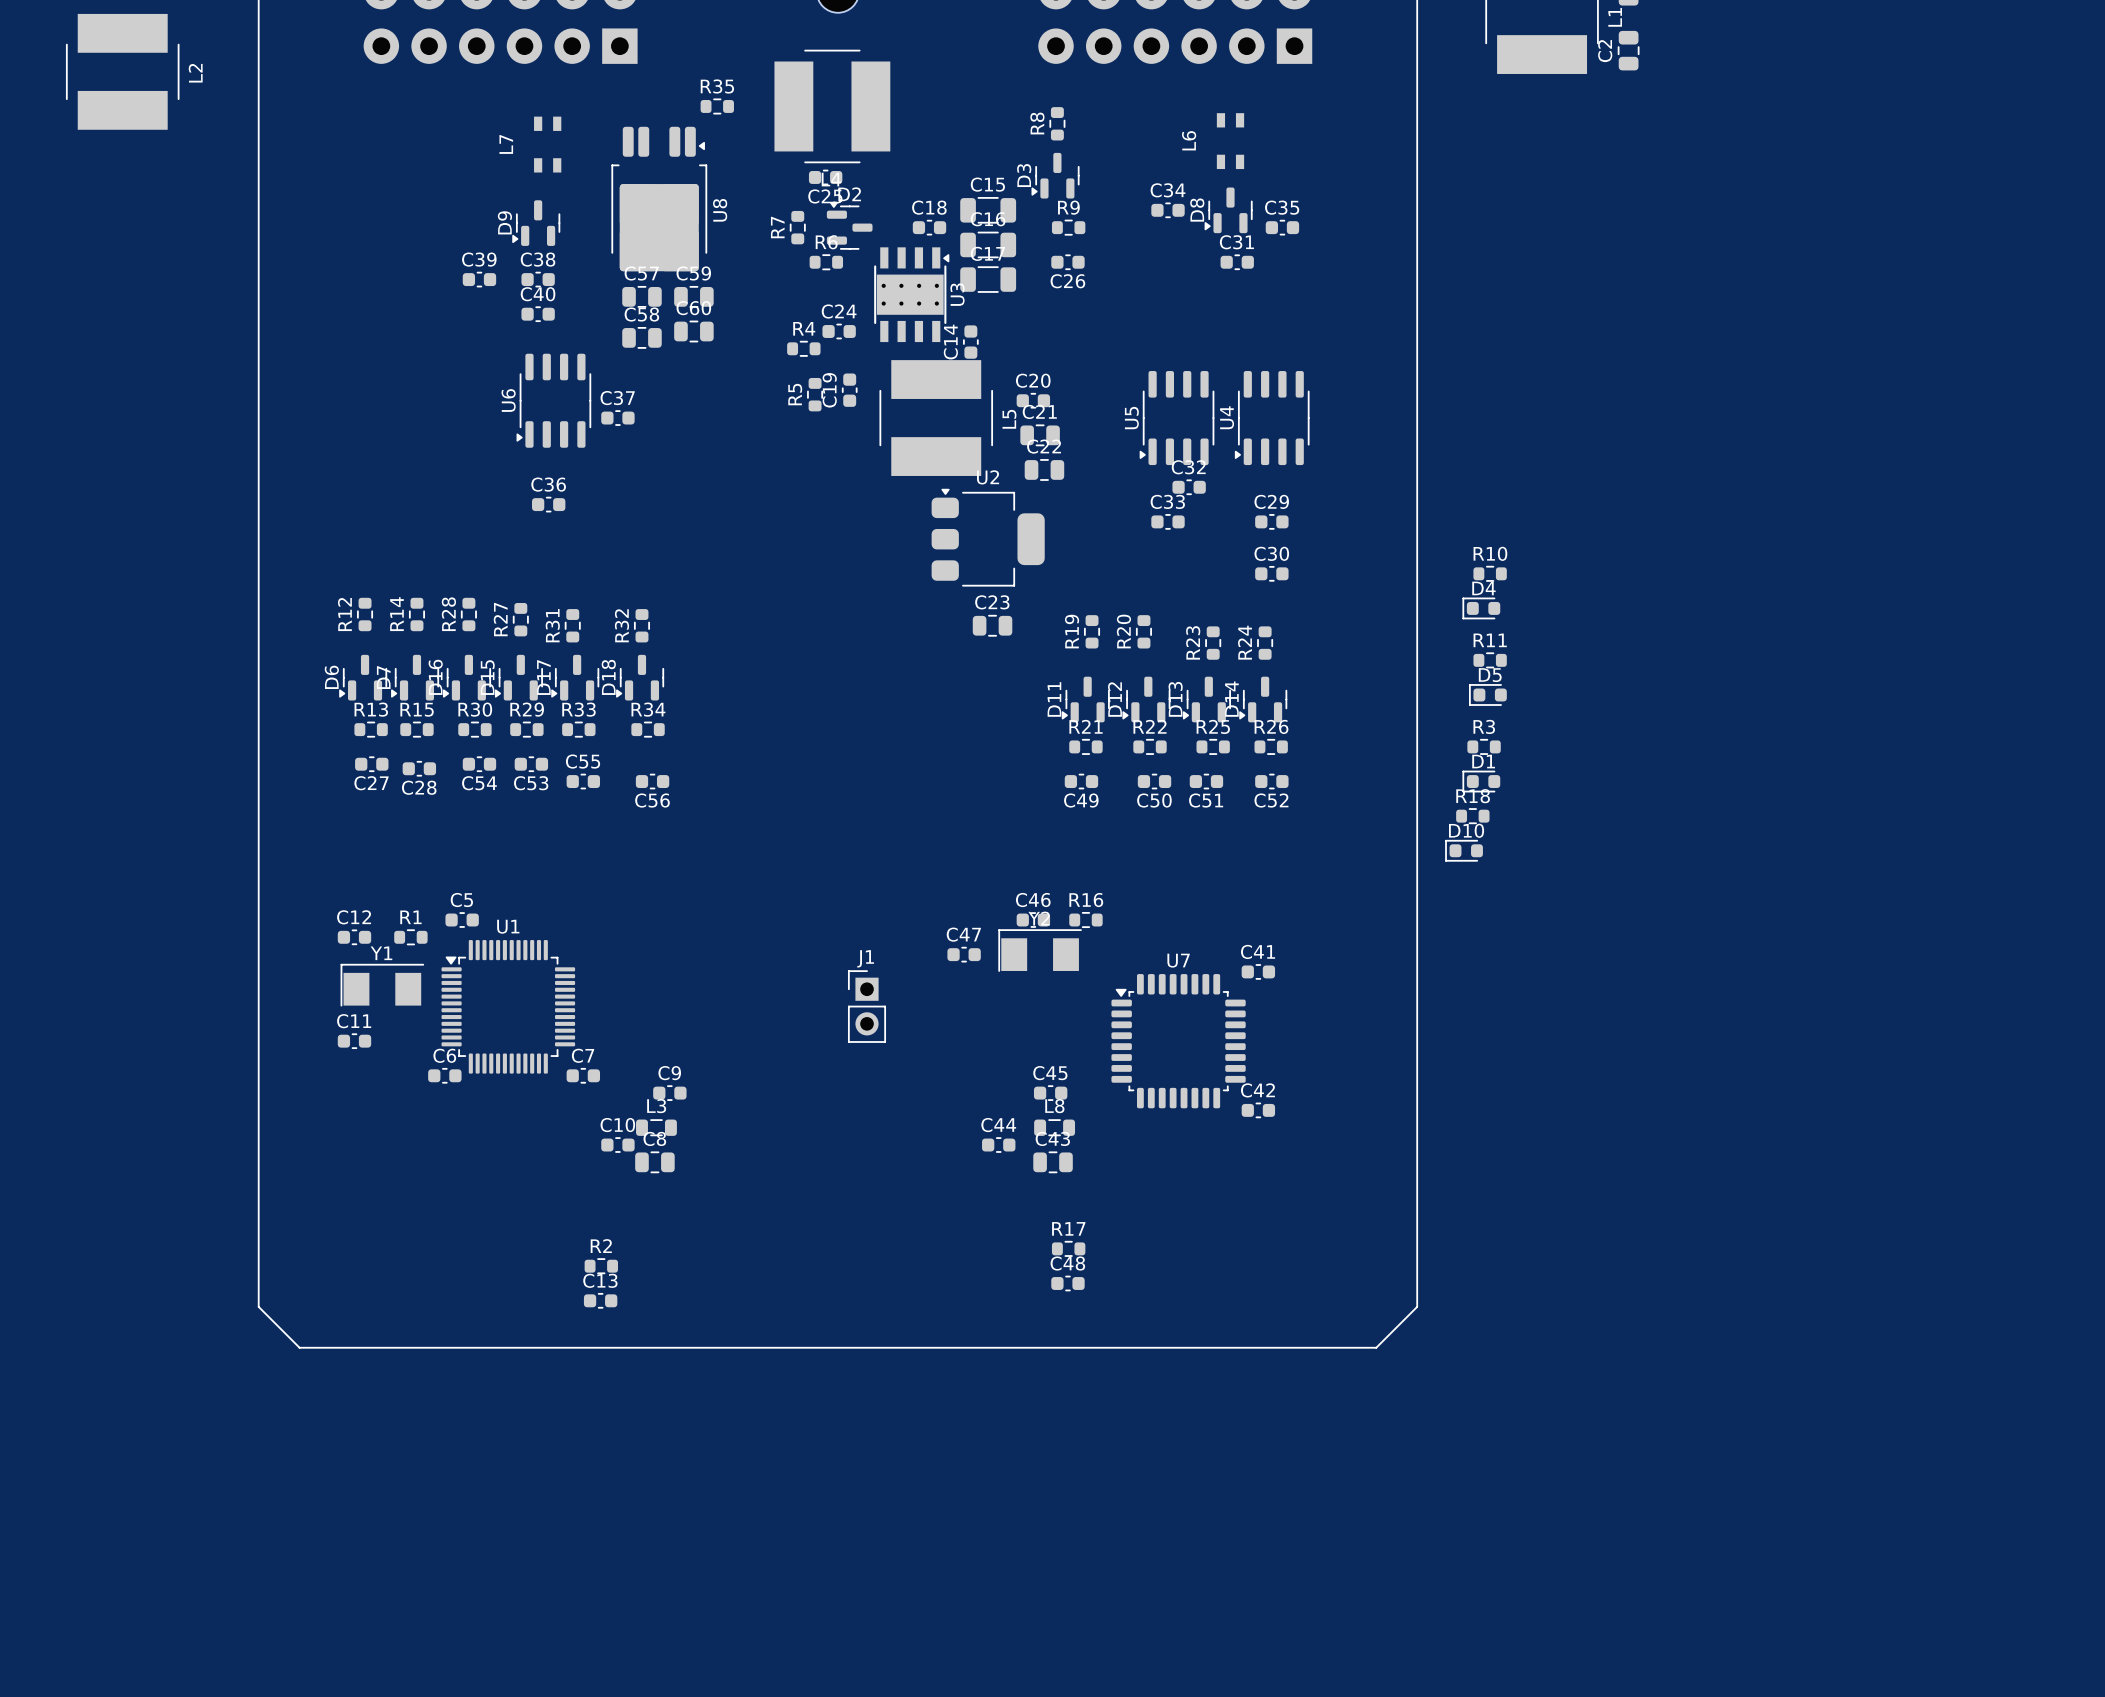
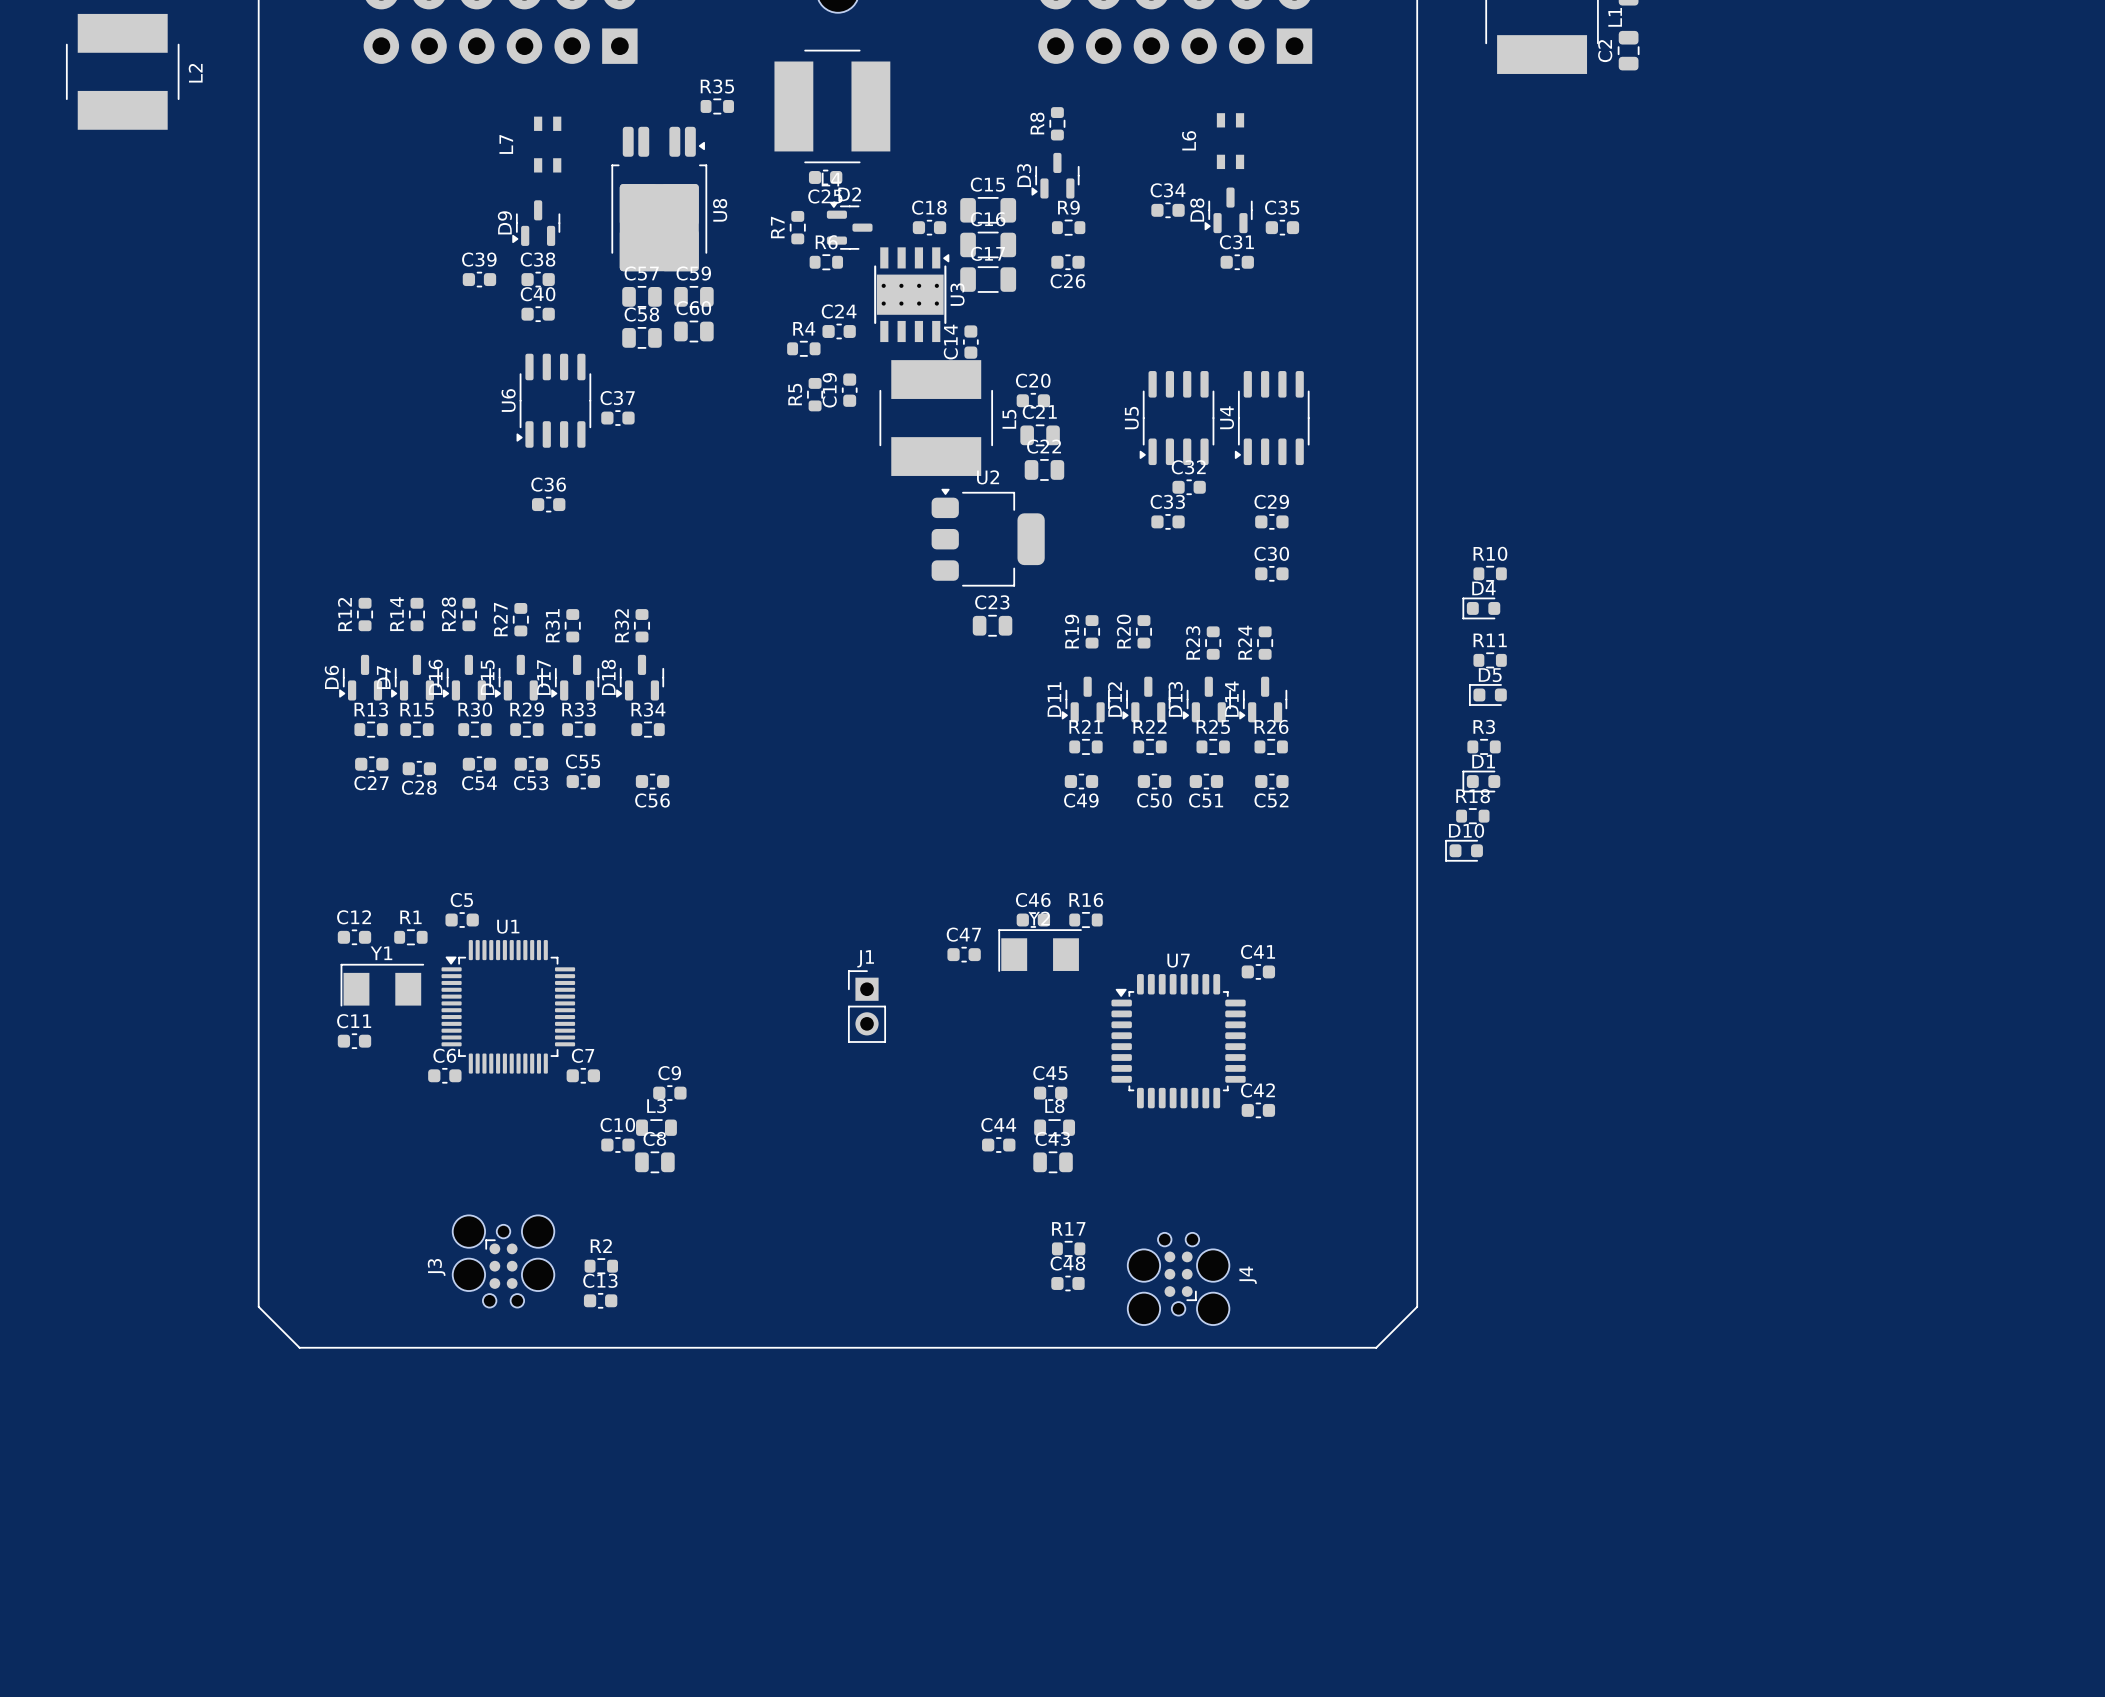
J3: none -> (503, 1261)
J4: none -> (1178, 1278)

